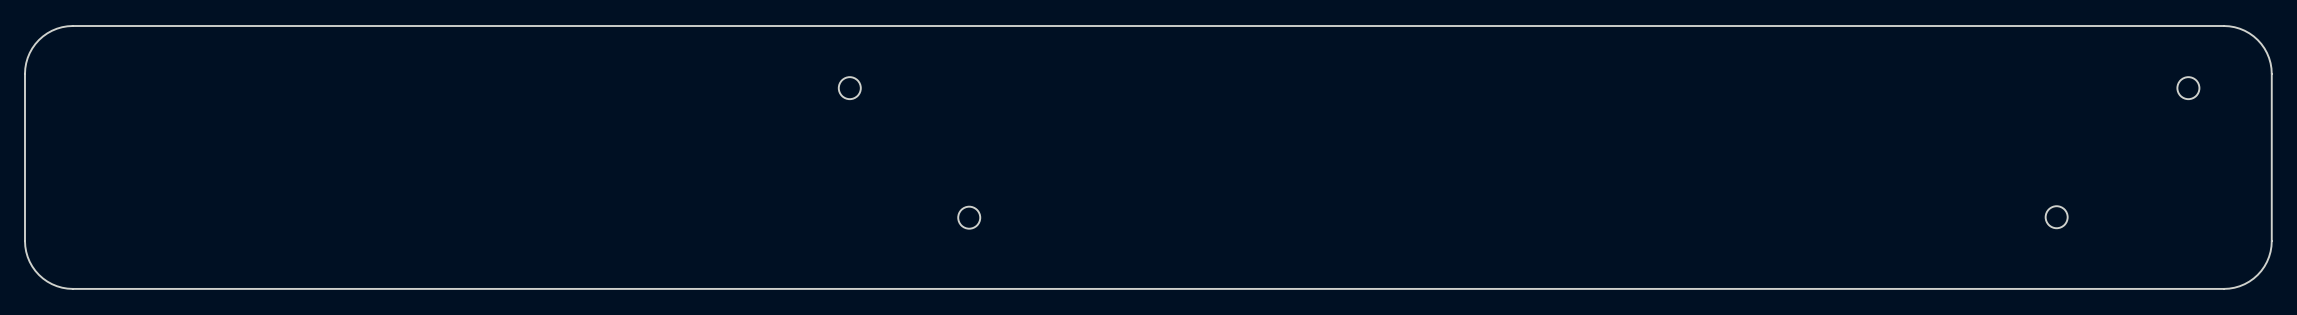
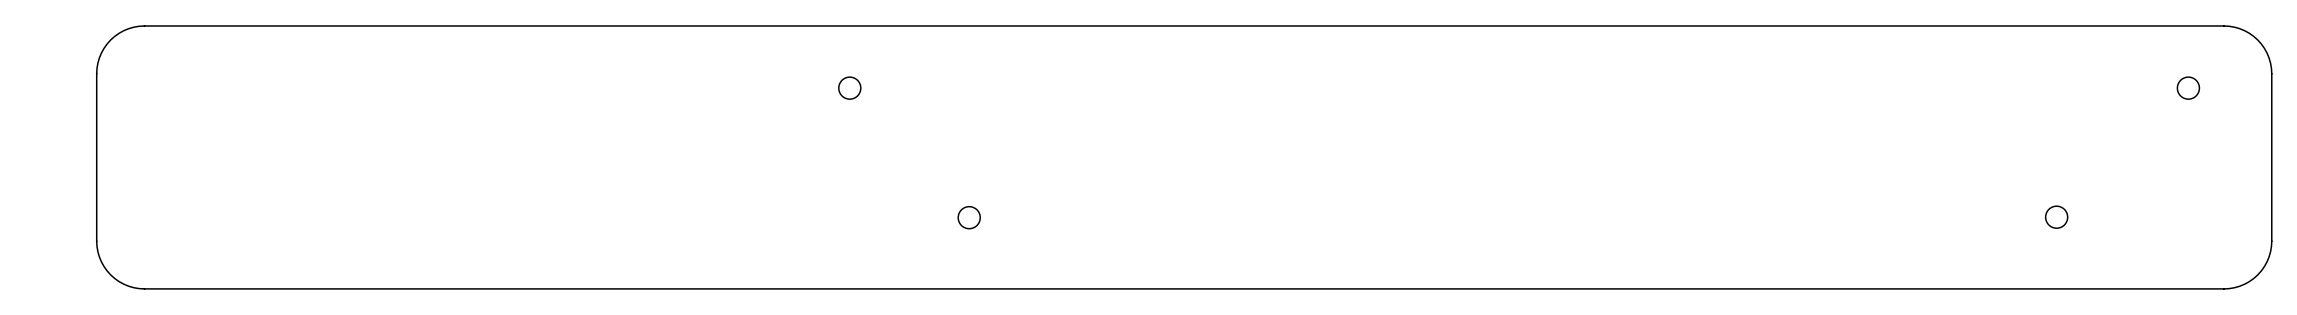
board edge: (144, 25) (72, 26) (57, 28) (42, 36) (32, 48) (26, 63) (25, 73) (25, 241) (26, 251) (32, 266) (47, 281) (62, 287) (144, 288) -> (144, 25) (123, 30) (110, 39) (101, 53) (96, 73) (97, 251) (104, 266) (114, 278) (128, 286) (144, 288)

